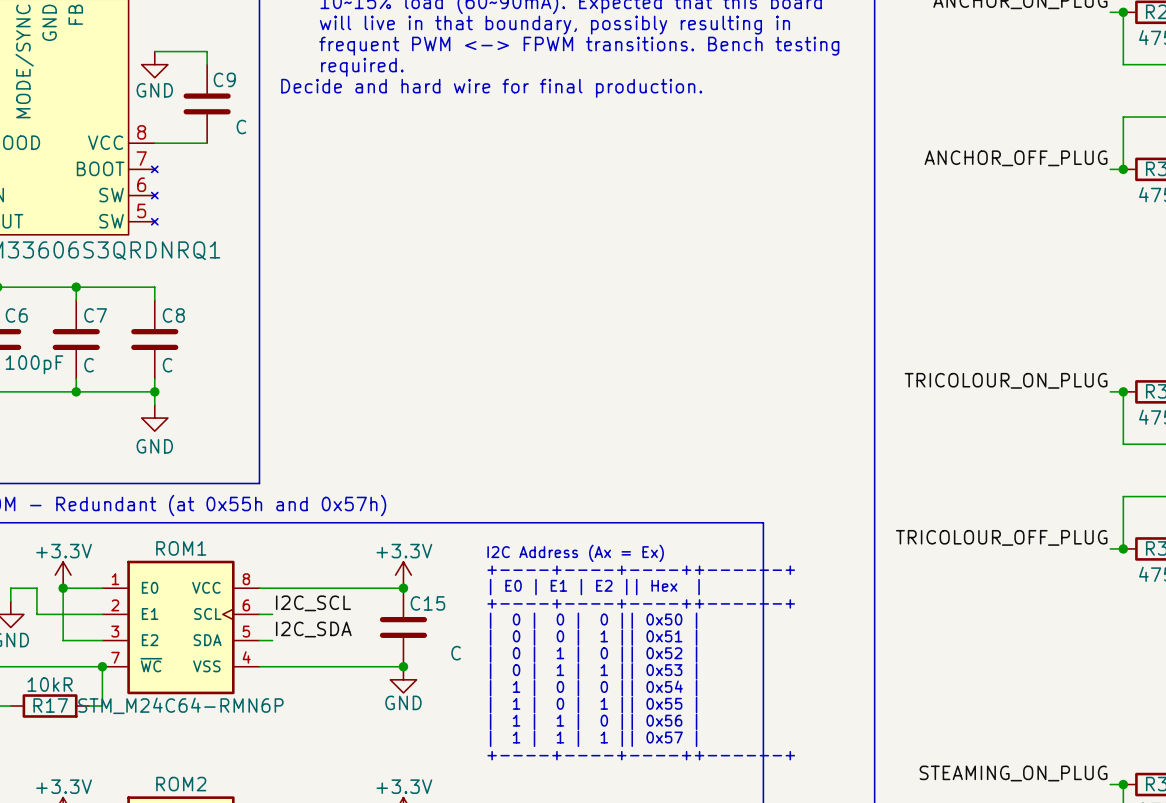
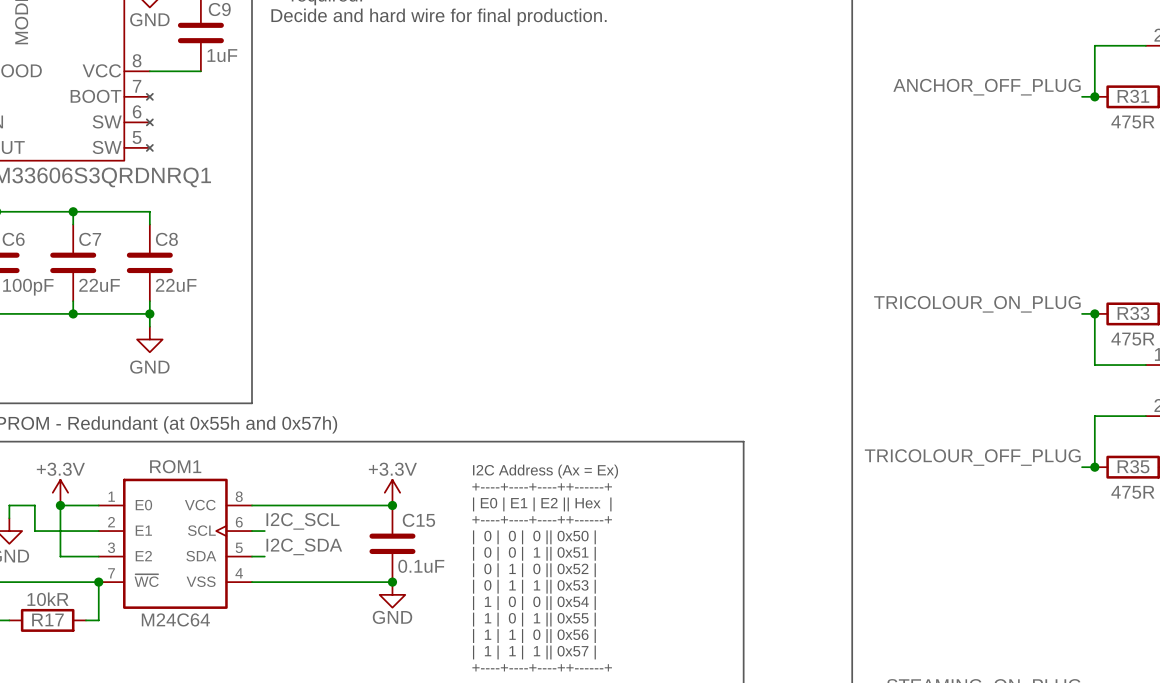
C9 value: C (241, 127) -> 1uF (222, 55)
C7 value: C (89, 365) -> 22uF (99, 285)
C8 value: C (167, 365) -> 22uF (176, 285)
C15 value: C (456, 653) -> 0.1uF (421, 566)
ROM1 value: STM_M24C64-RMN6P (180, 705) -> M24C64 (175, 619)

